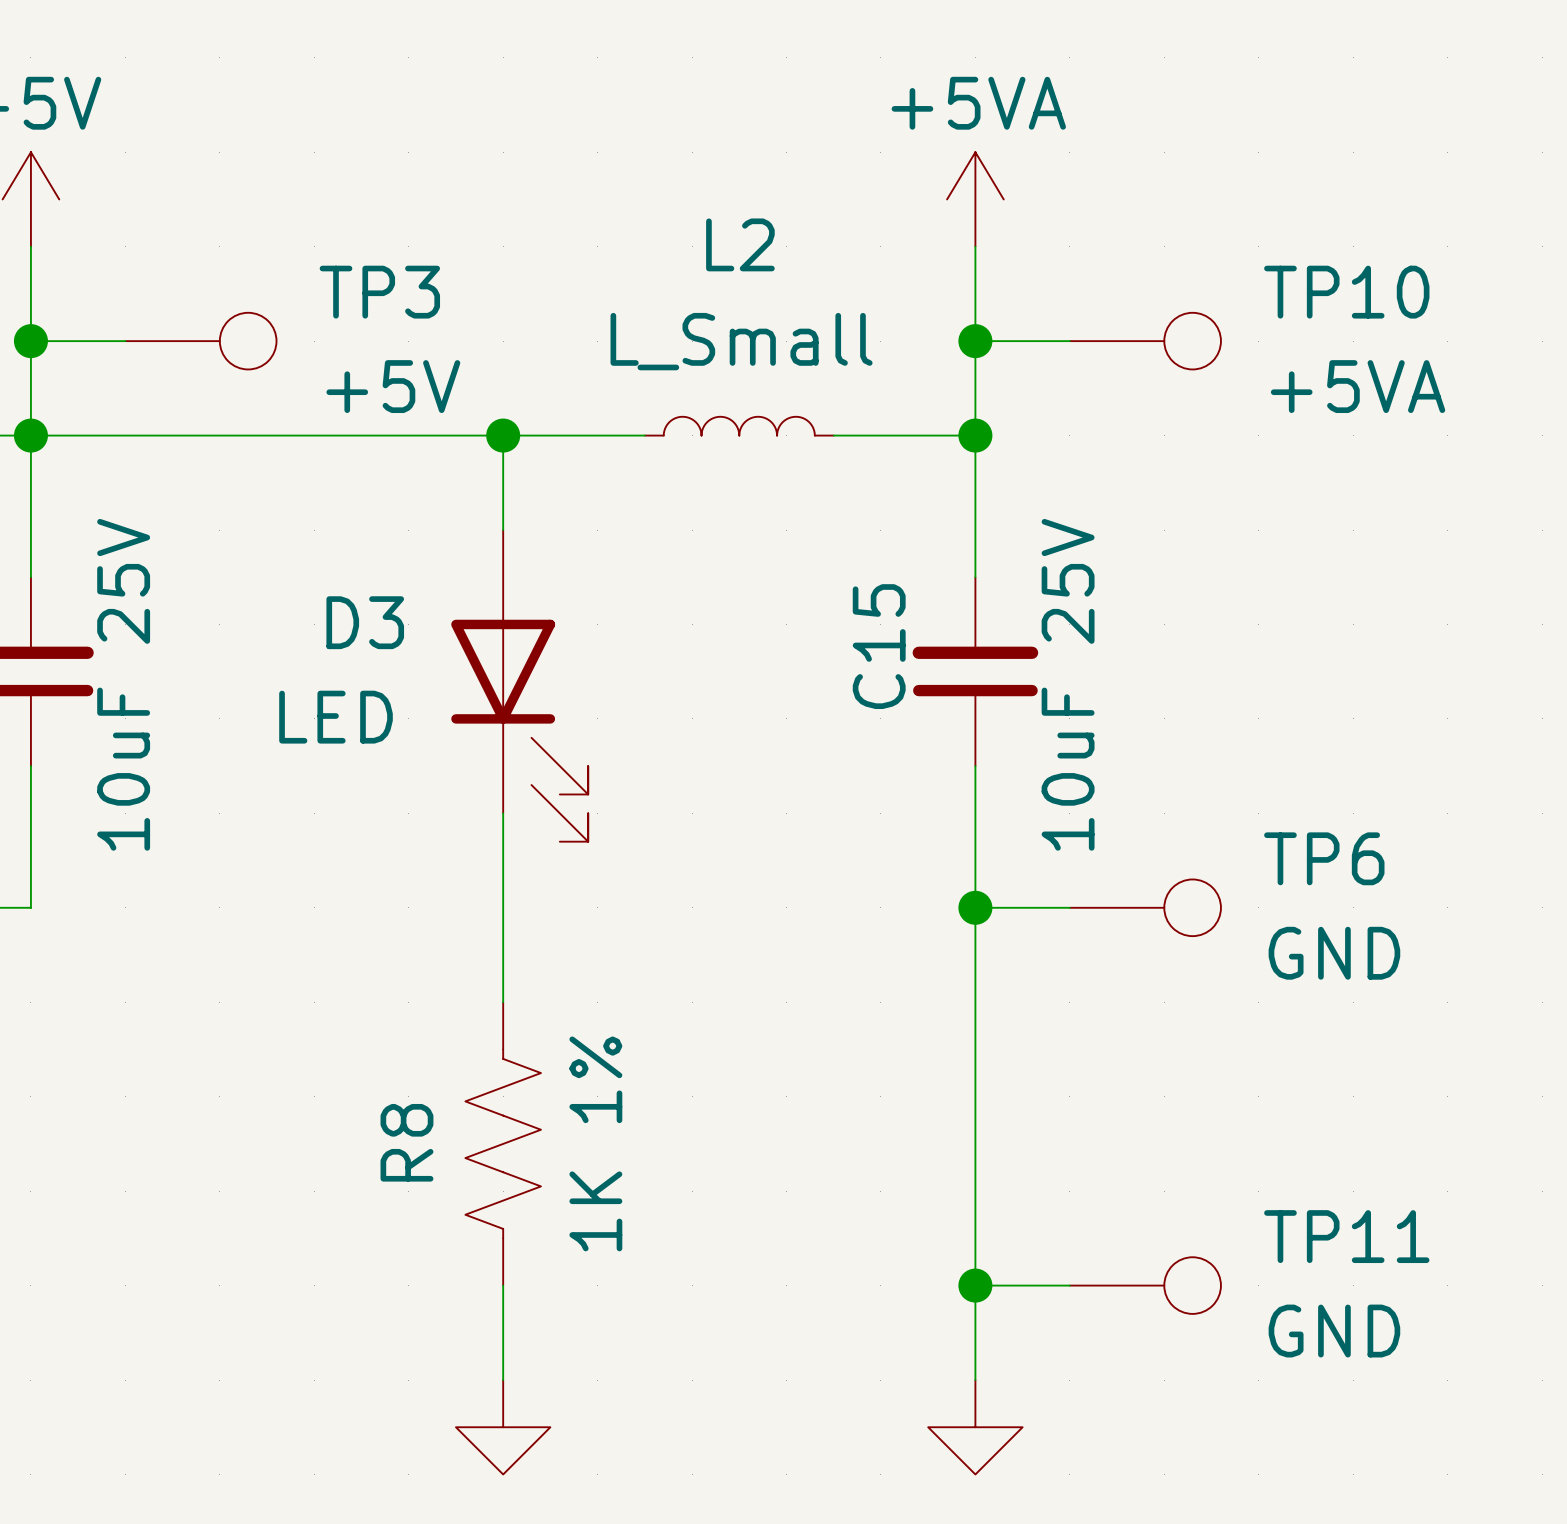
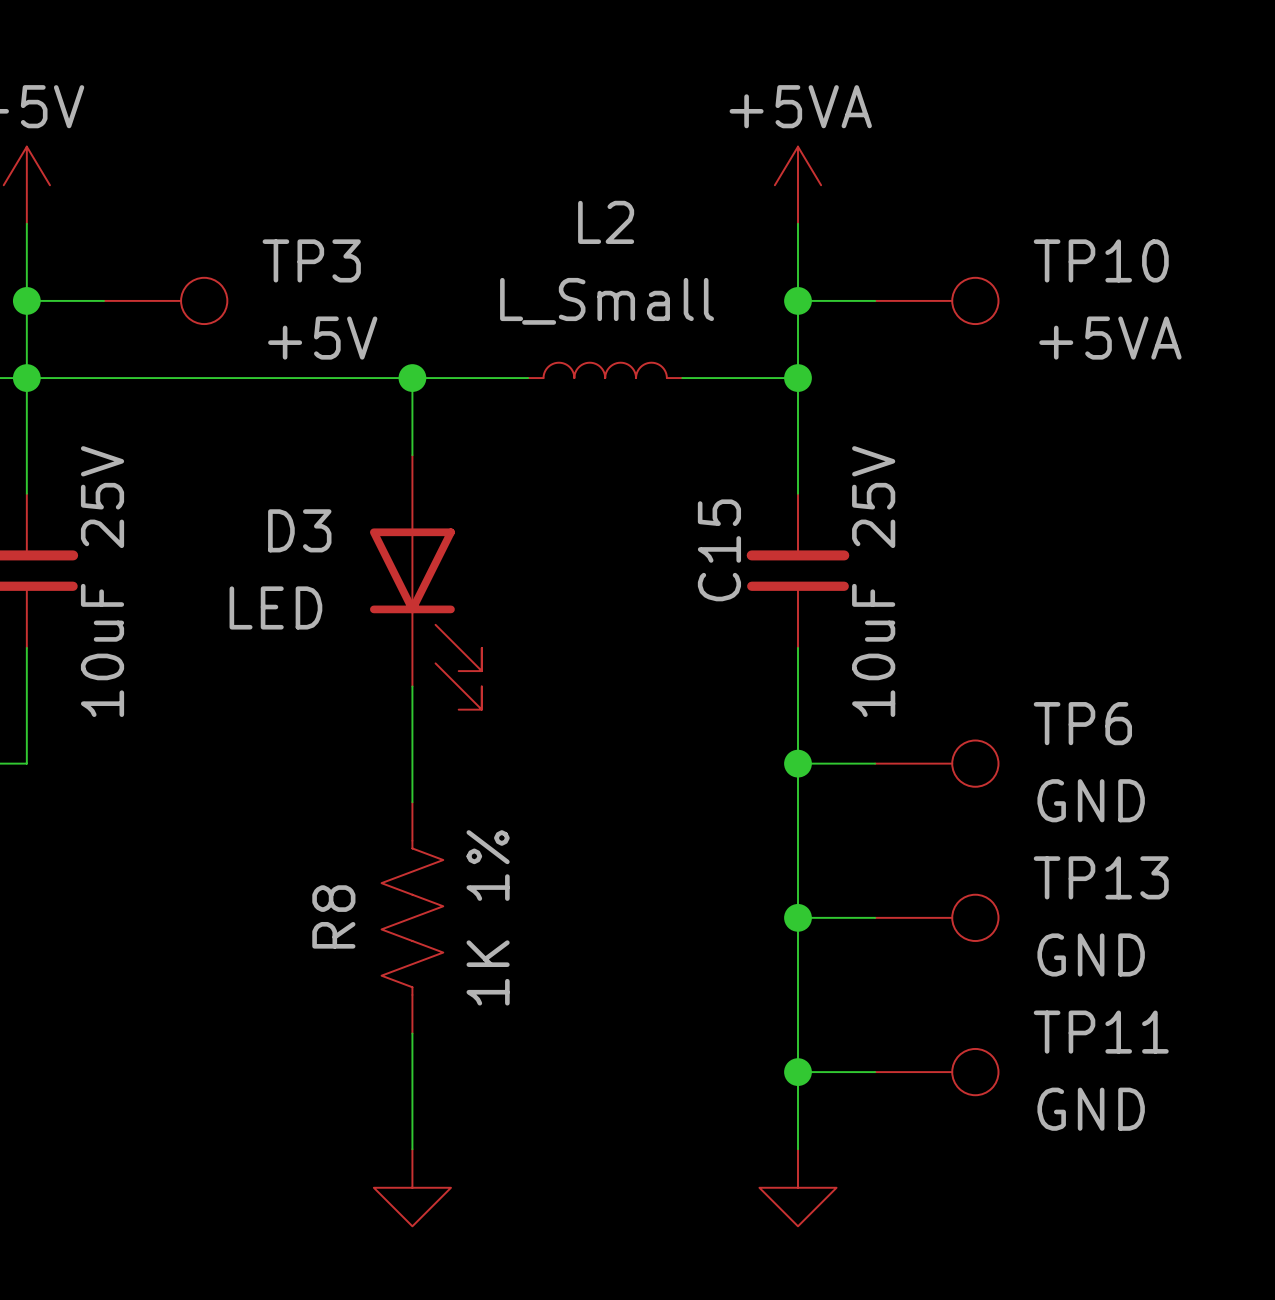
wire: none -> (798, 917) (875, 917)
junction: none -> (798, 917)
TP13: none -> GND (936, 917)
R8 position: (503, 1143) -> (412, 917)

